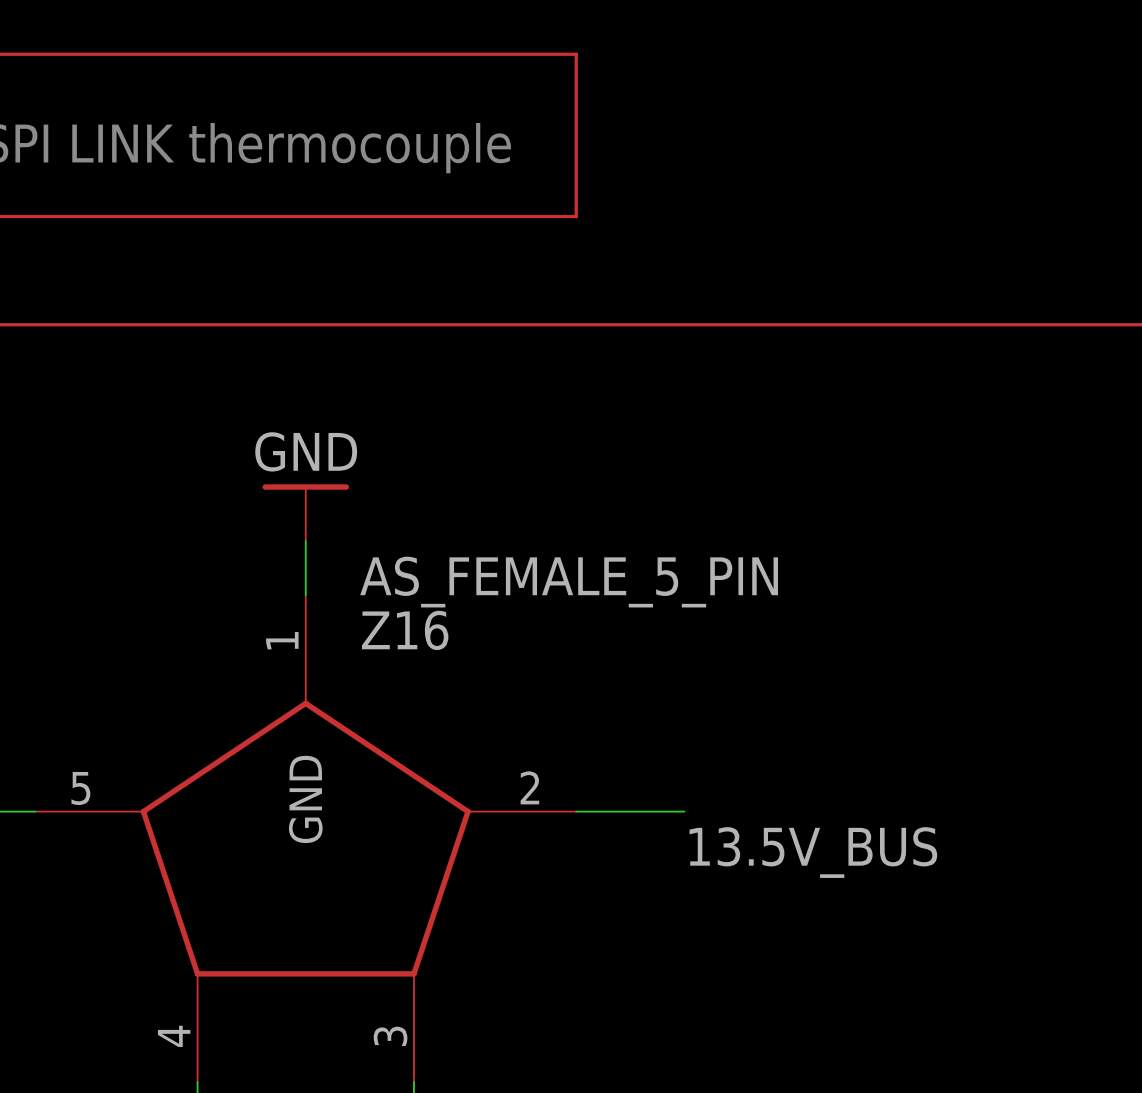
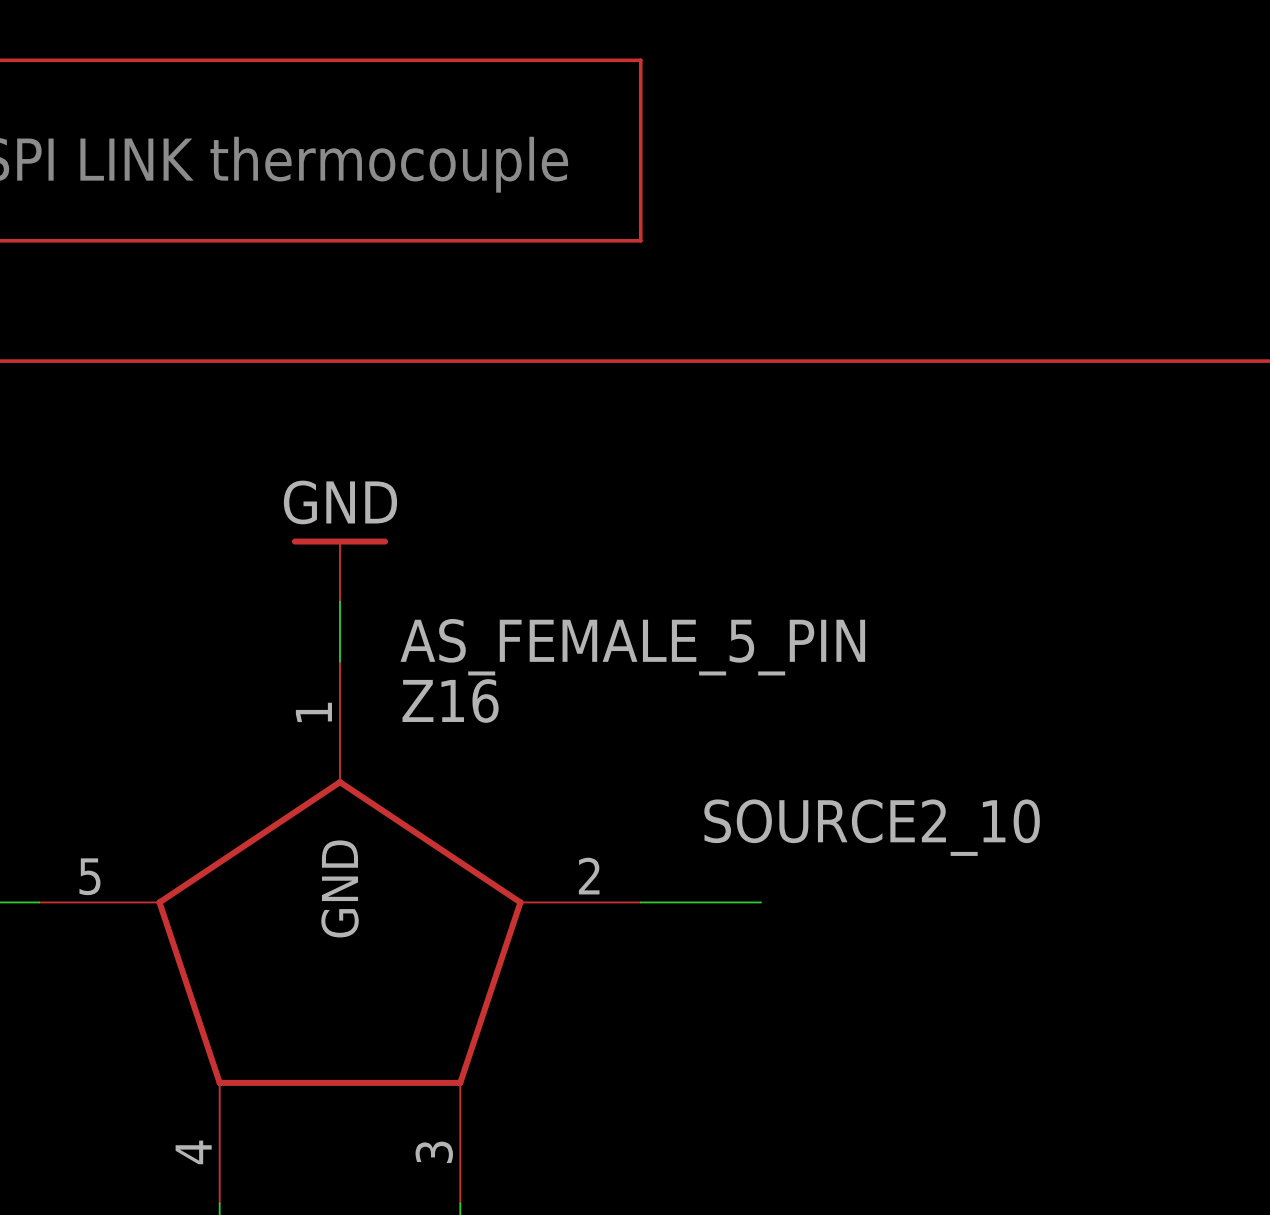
label: none -> SOURCE2_10 (872, 827)
label: 13.5V_BUS (813, 852) -> none

